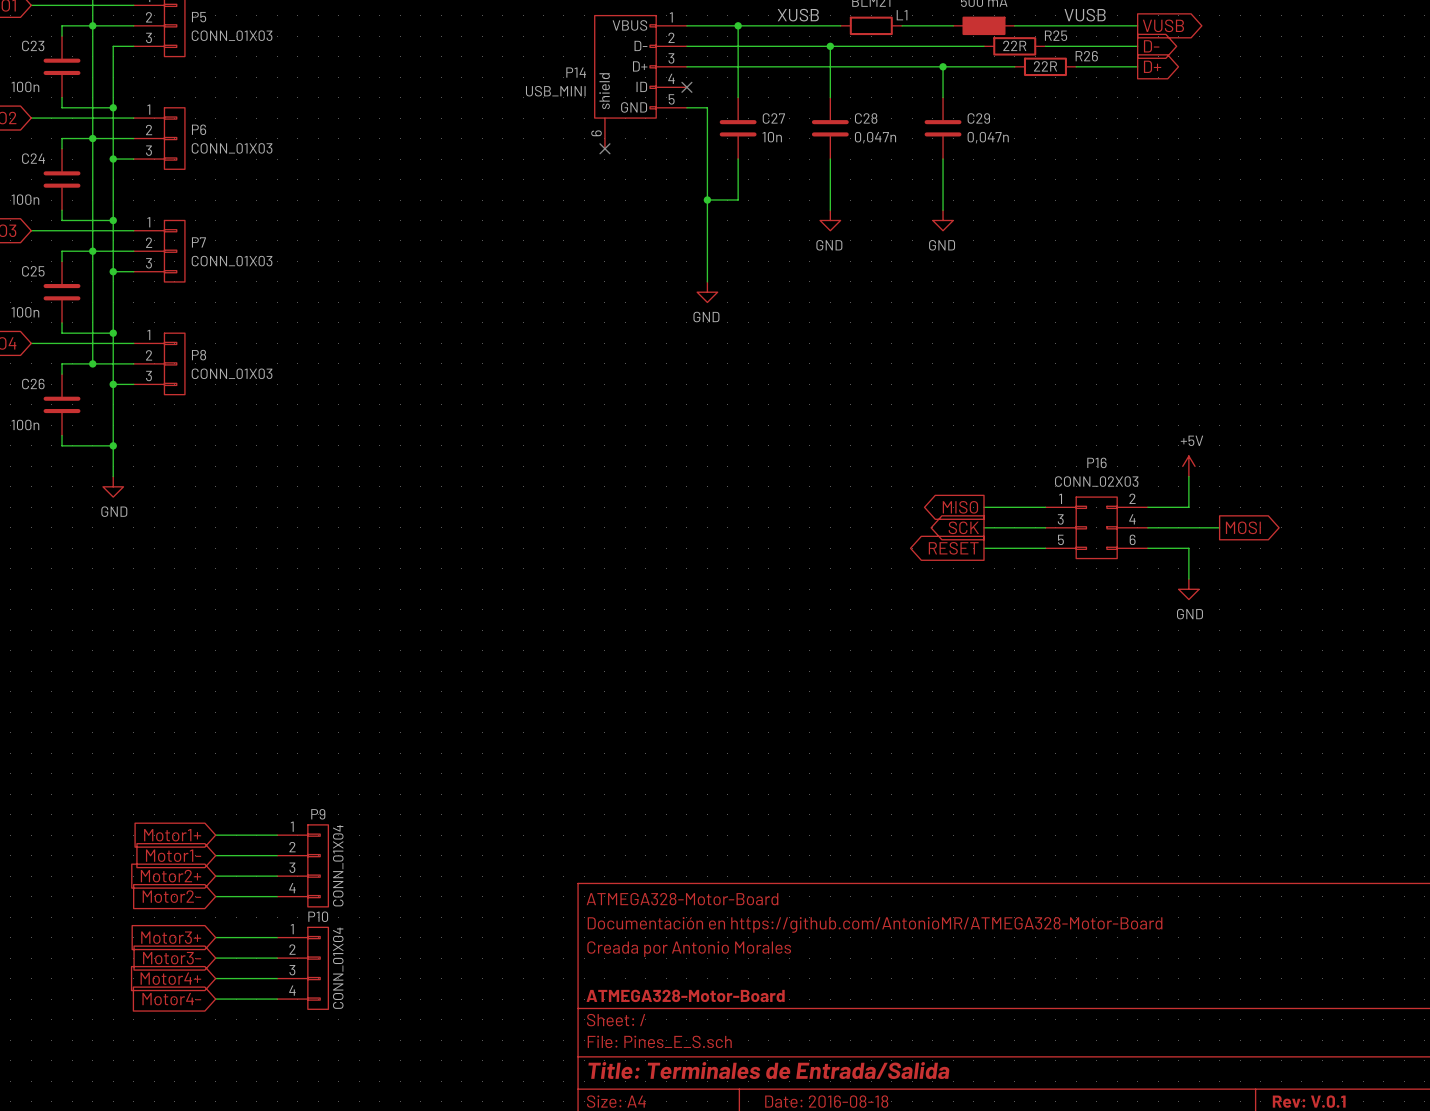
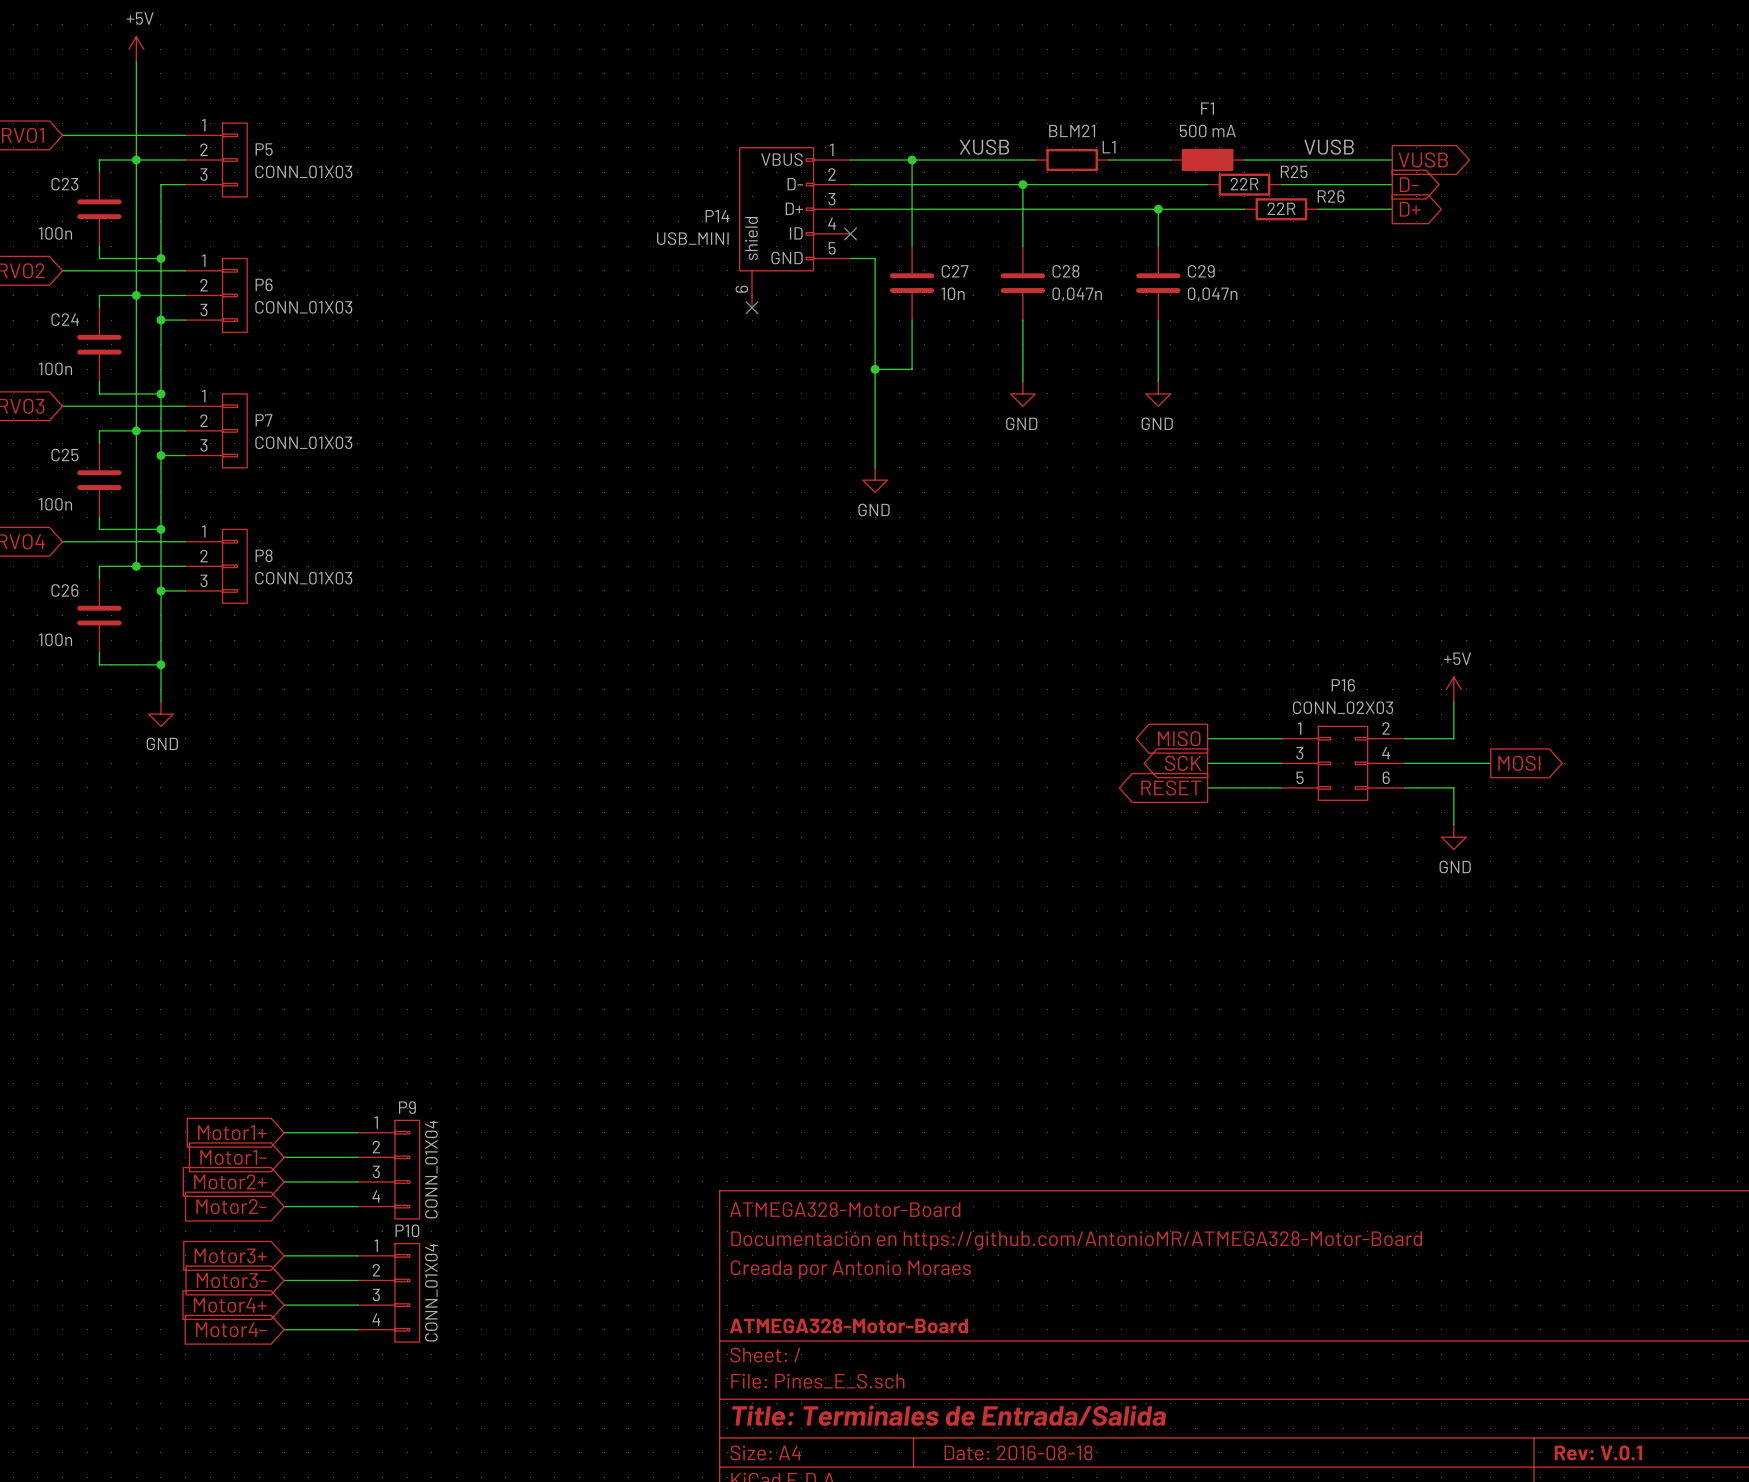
title block: Creada por Antonio Morales (689, 949) -> Creada por Antonio Moraes (850, 1269)

